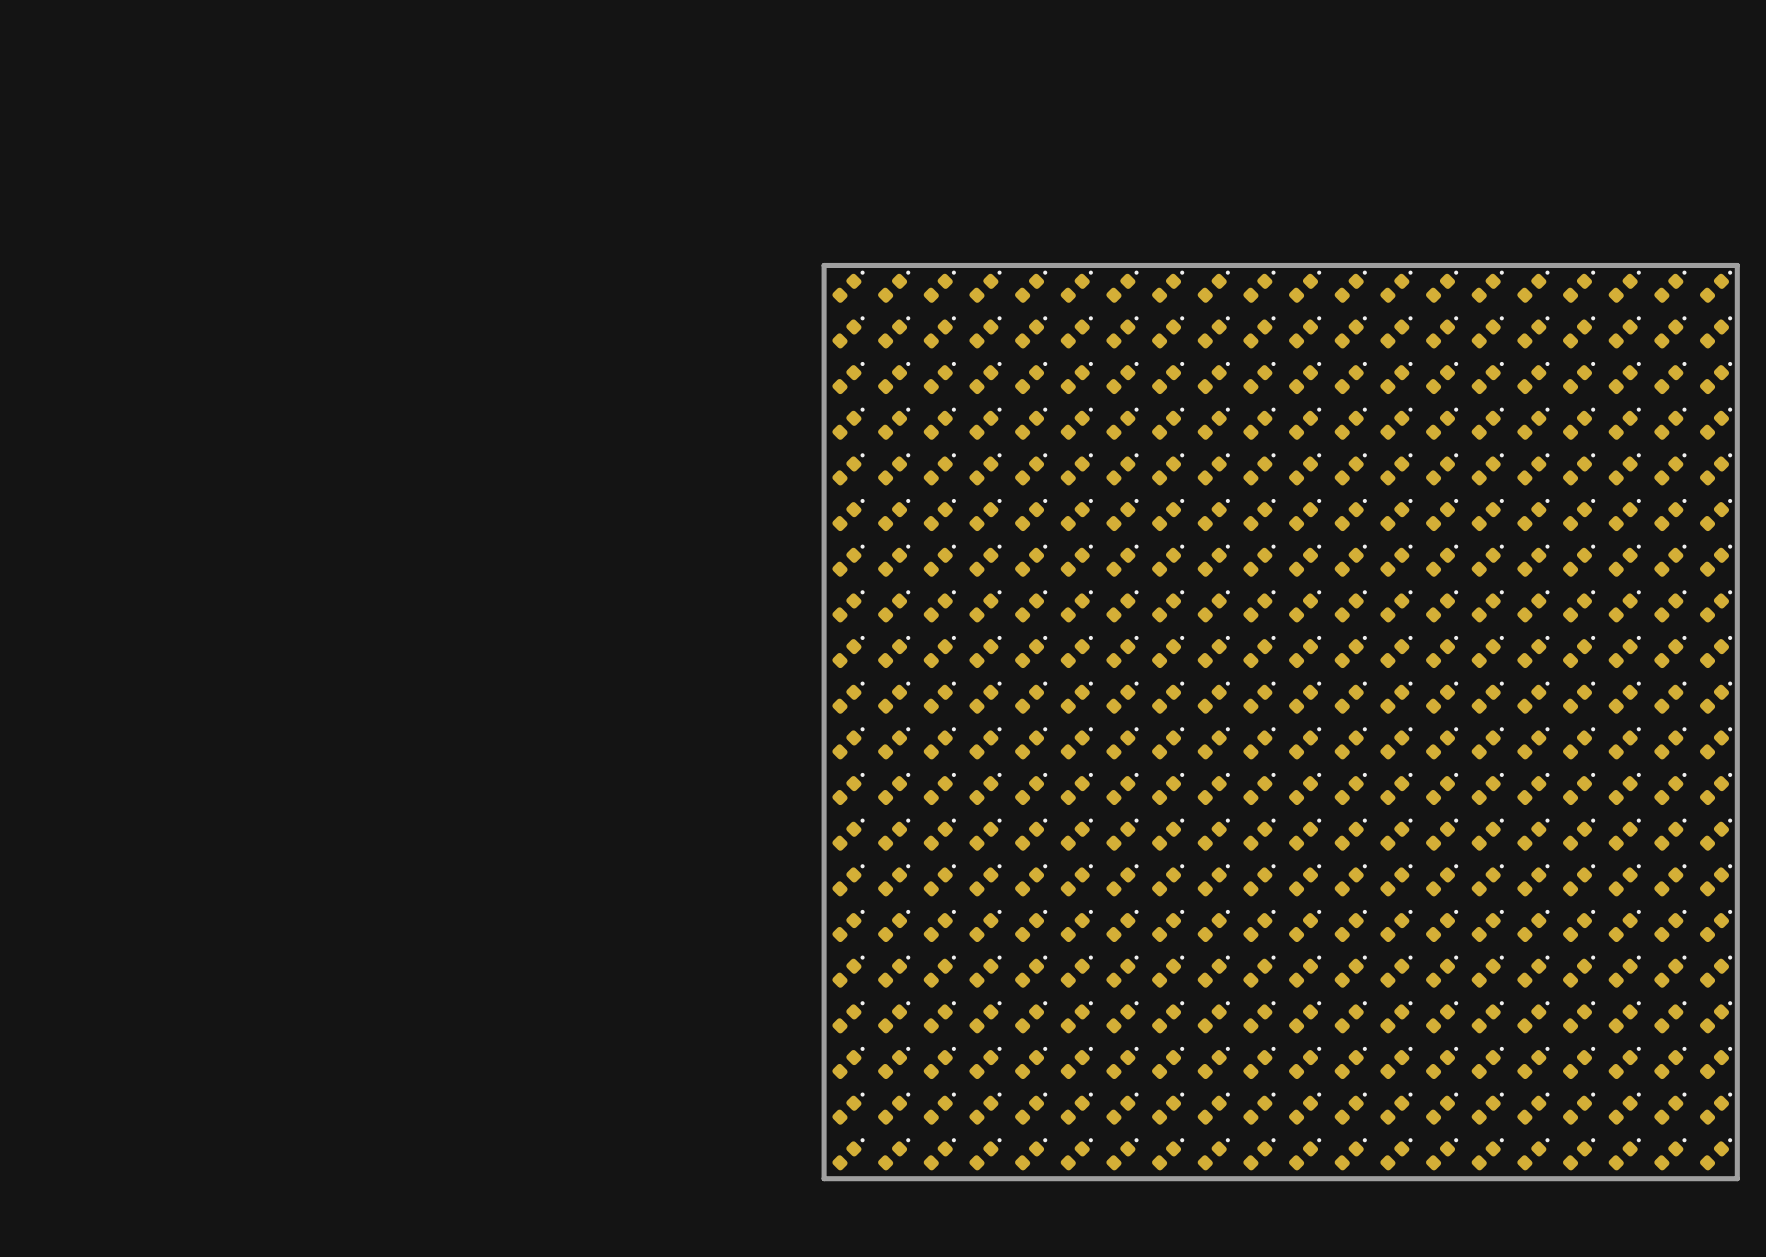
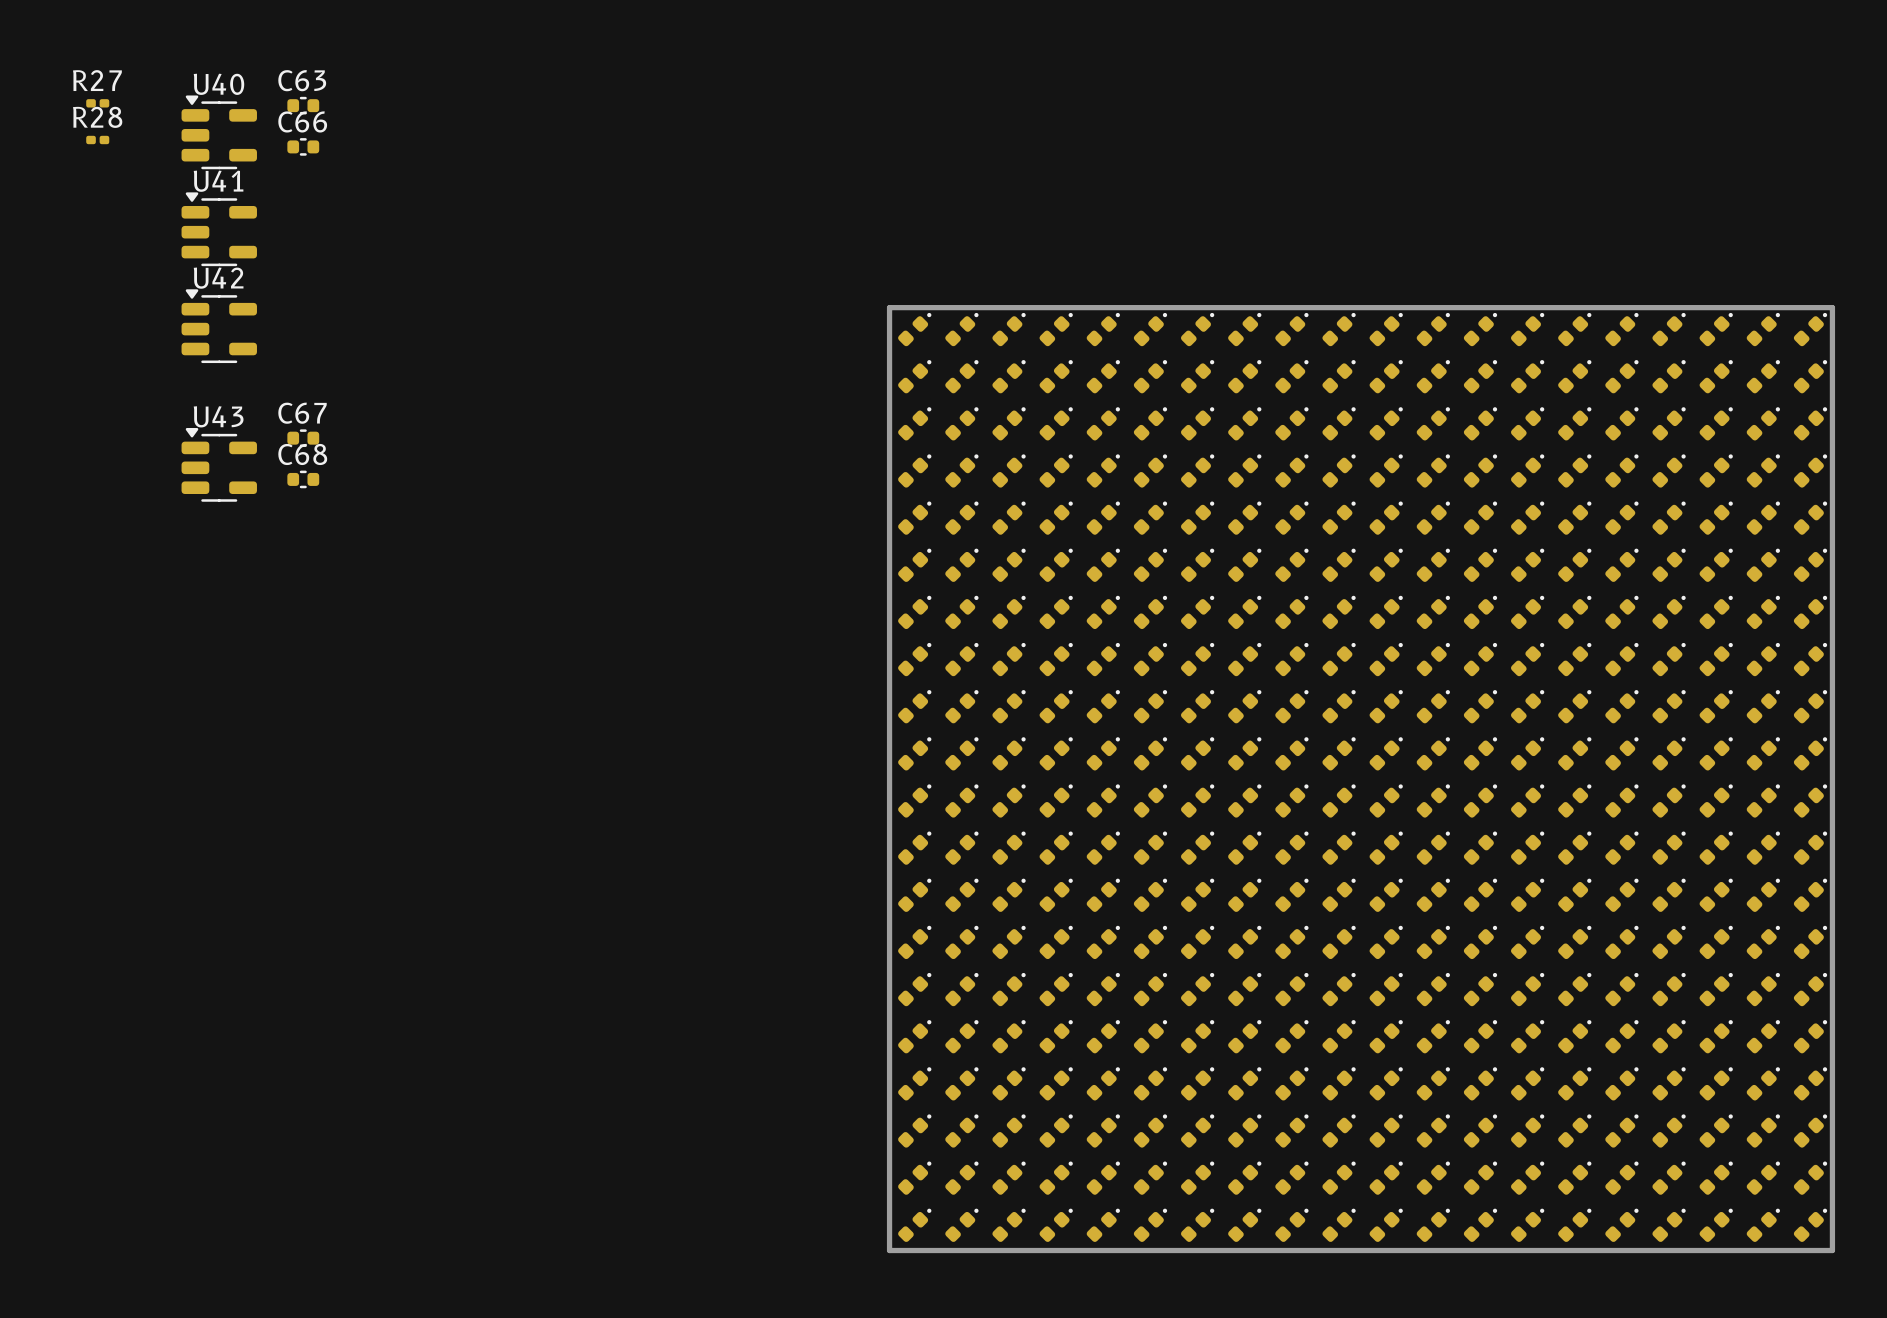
R27: none -> (97, 103)
C63: none -> (303, 105)
U40: none -> (219, 132)
R28: none -> (97, 140)
C66: none -> (303, 146)
U41: none -> (219, 229)
U42: none -> (219, 326)
C67: none -> (303, 438)
U43: none -> (219, 464)
C68: none -> (303, 479)

